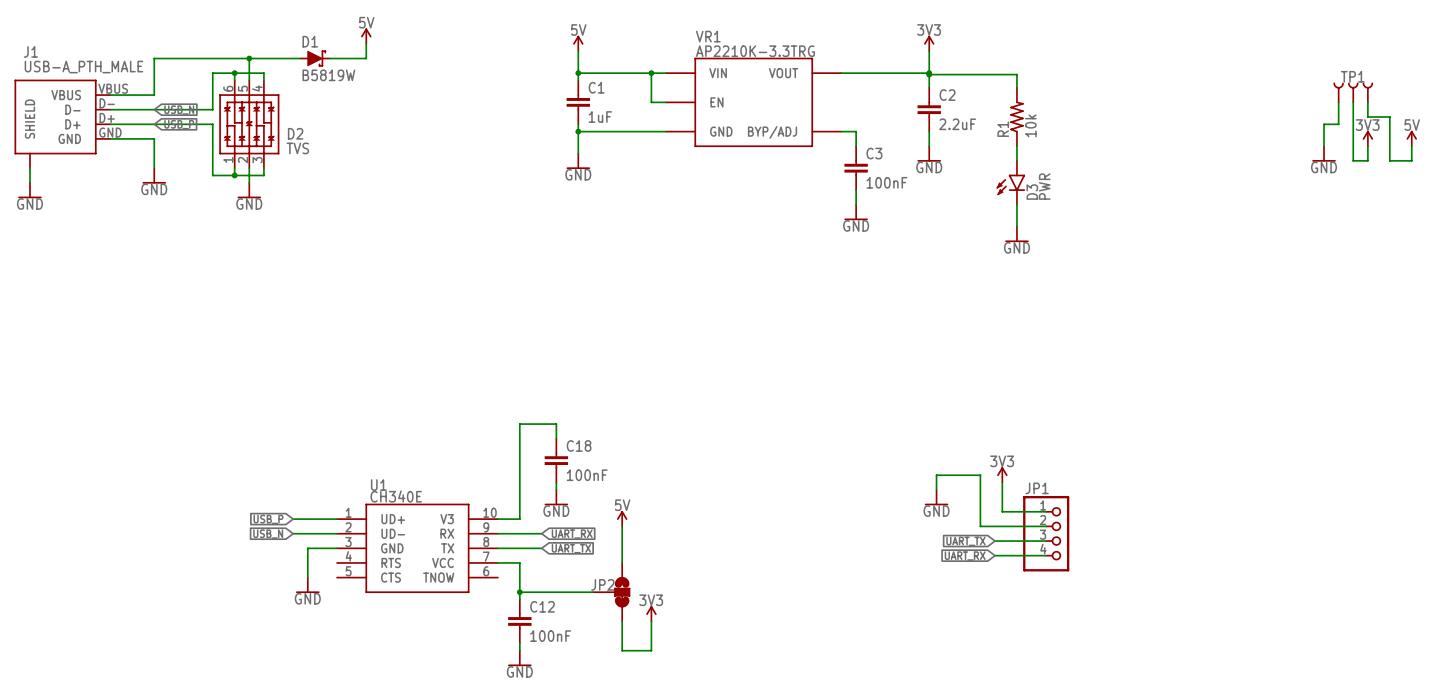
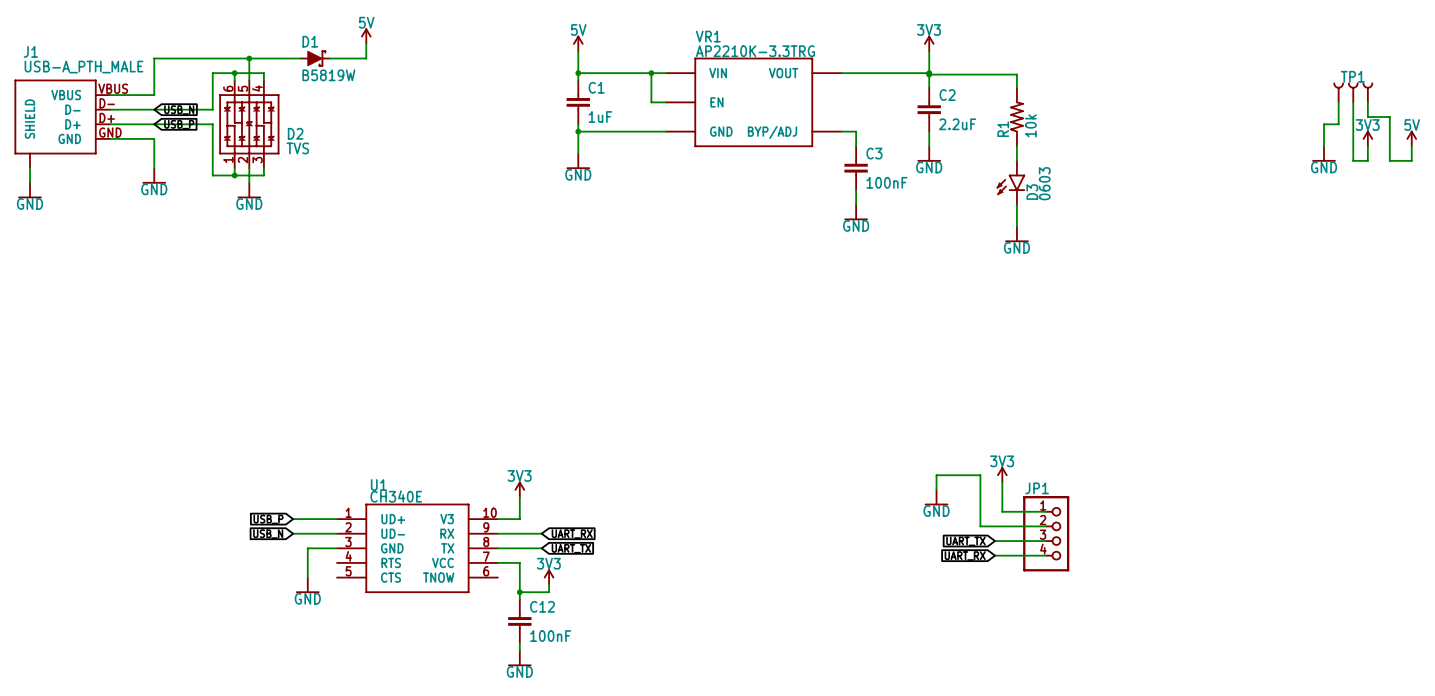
D3 value: PWR (1044, 186) -> 0603 (1044, 183)
wire: (556, 438) (556, 424) (519, 424) (519, 497) -> none
C18: 100nF (556, 460) -> none
wire: (556, 482) (556, 489) -> none
power symbol: none -> 3V3 (519, 489)
power symbol: GND (556, 497) -> none
power symbol: 5V (622, 518) -> none
wire: (622, 526) (622, 562) -> none
power symbol: none -> 3V3 (549, 577)
wire: (549, 592) (592, 592) -> (549, 592) (549, 584)
JP2: (611, 592) -> none
power symbol: 3V3 (651, 613) -> none
wire: (622, 621) (622, 650) (651, 650) (651, 621) -> none

